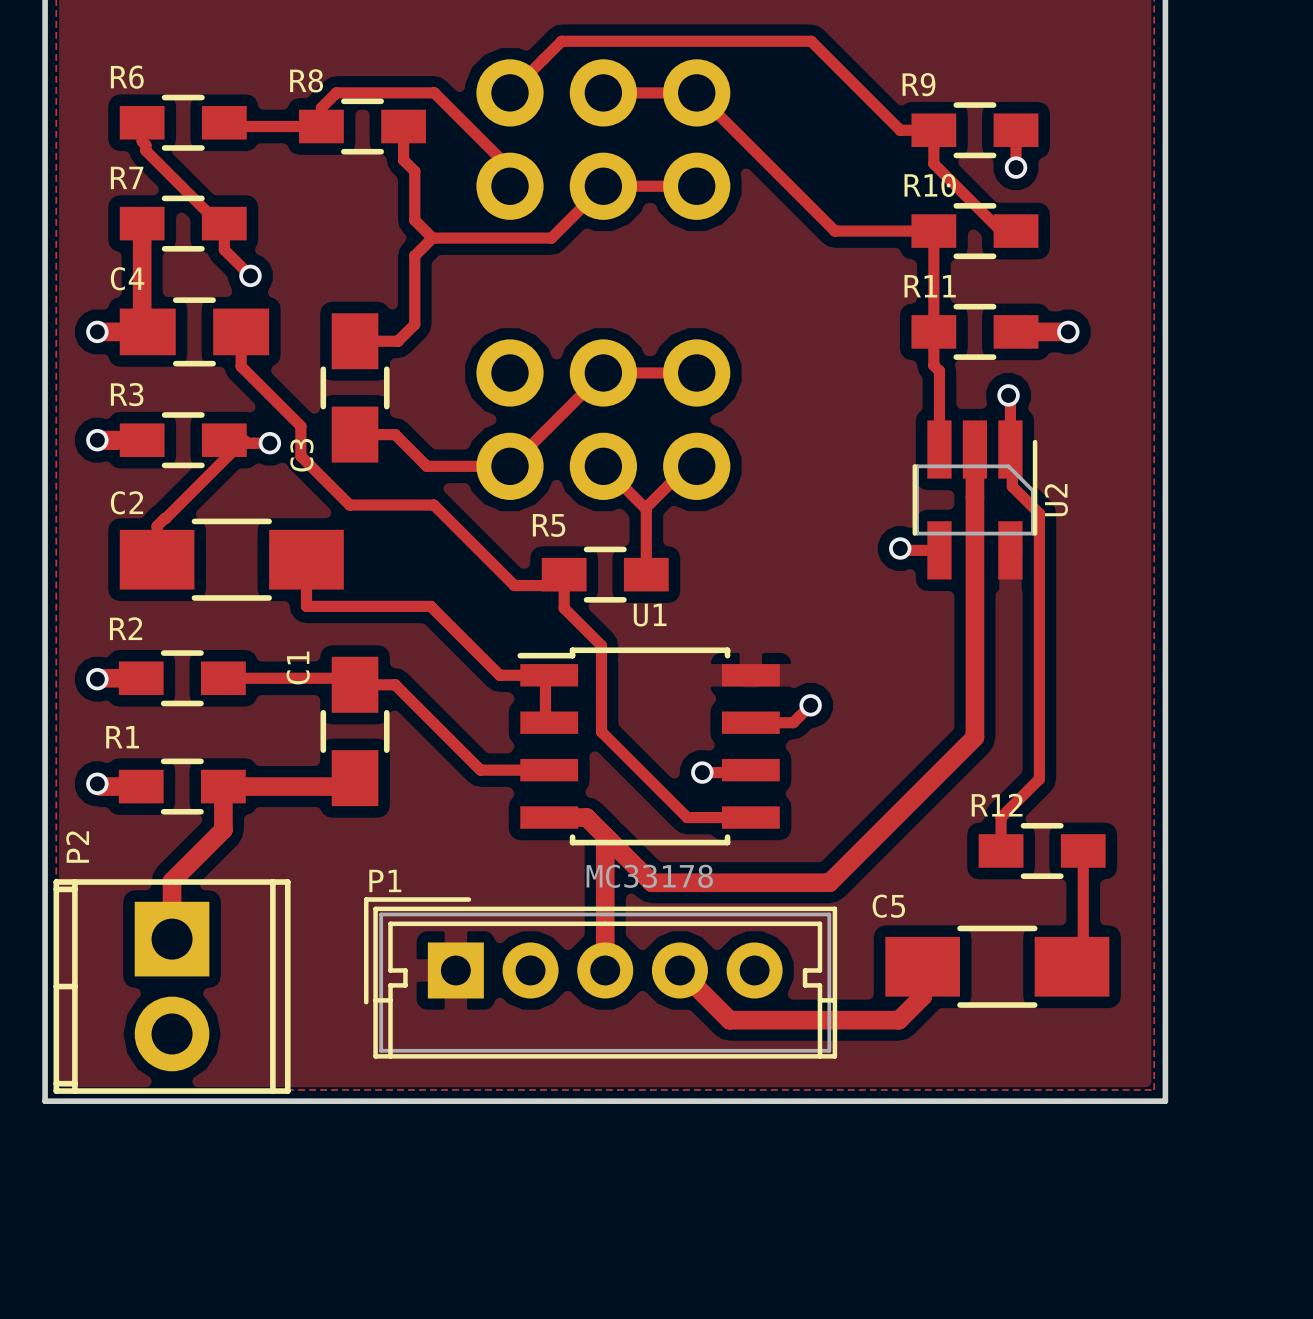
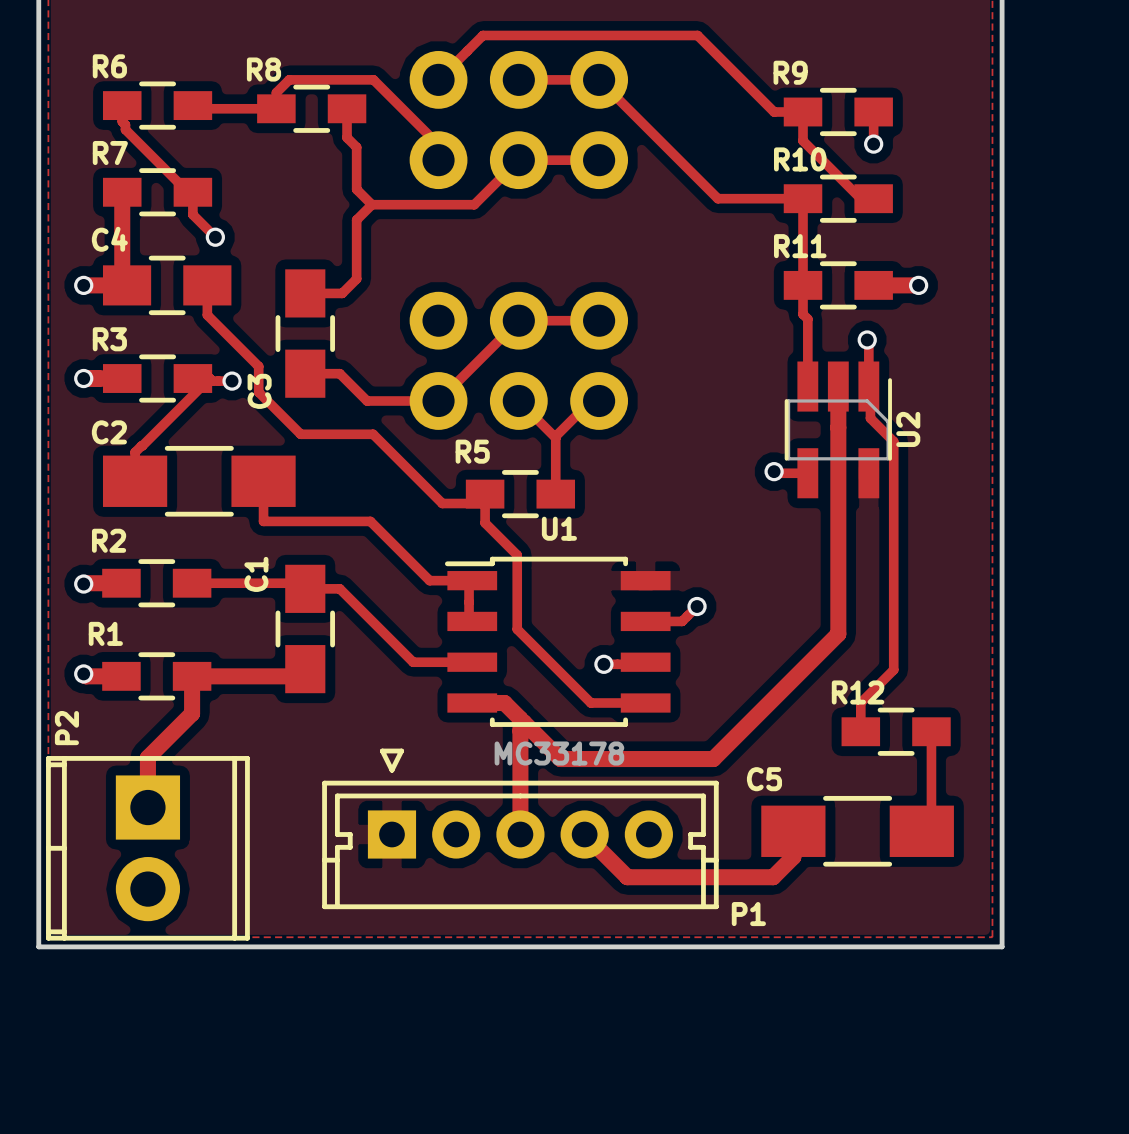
P1 name position: P1 (385, 880) -> P1 (748, 914)
P1 footprint: [363, 897, 838, 1059] -> [322, 748, 719, 910]

